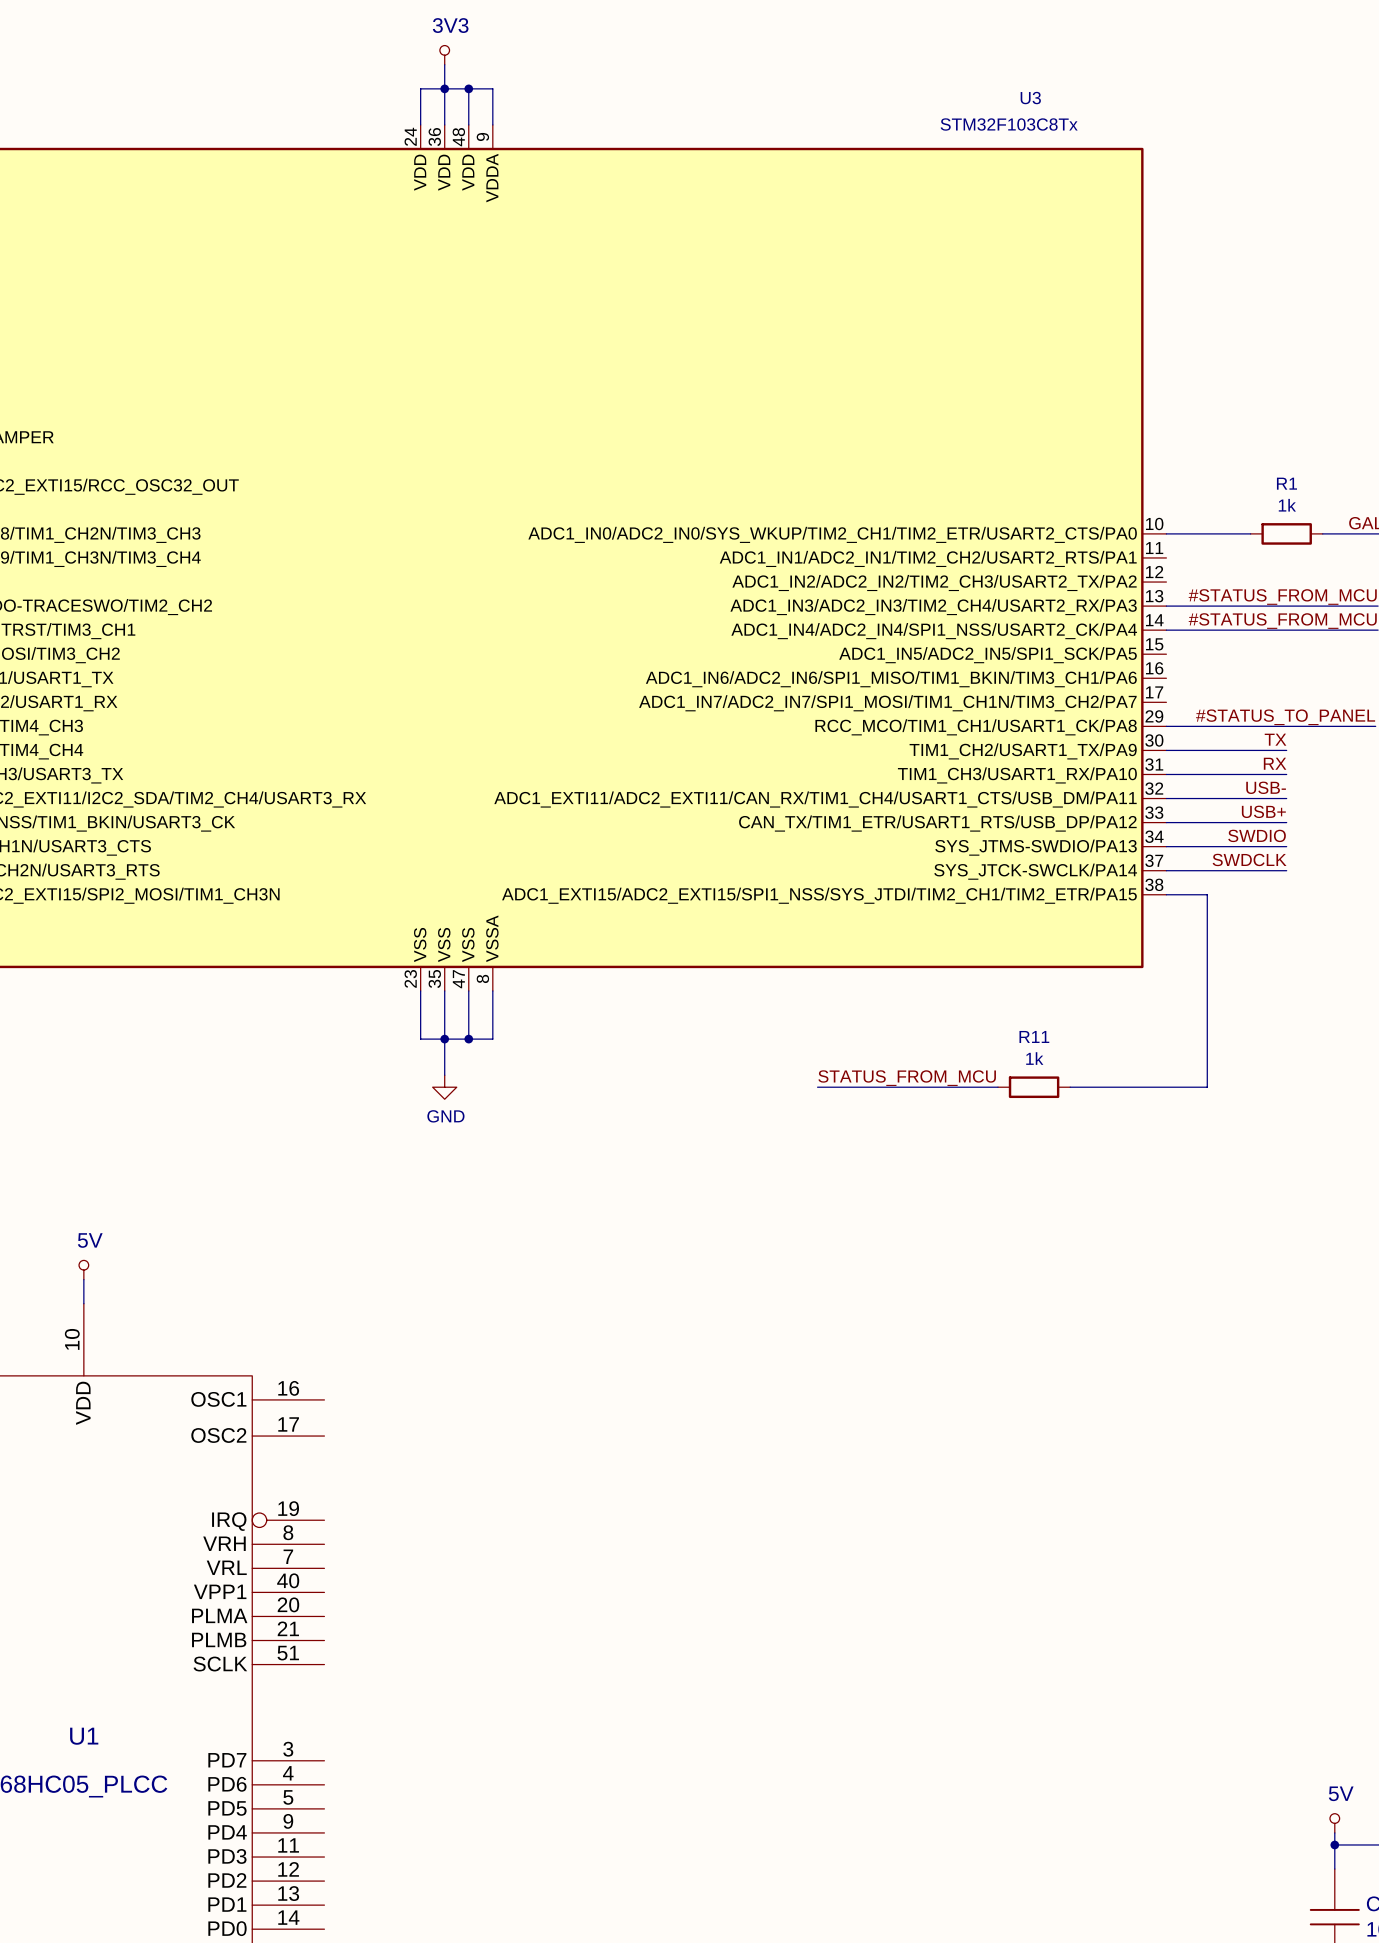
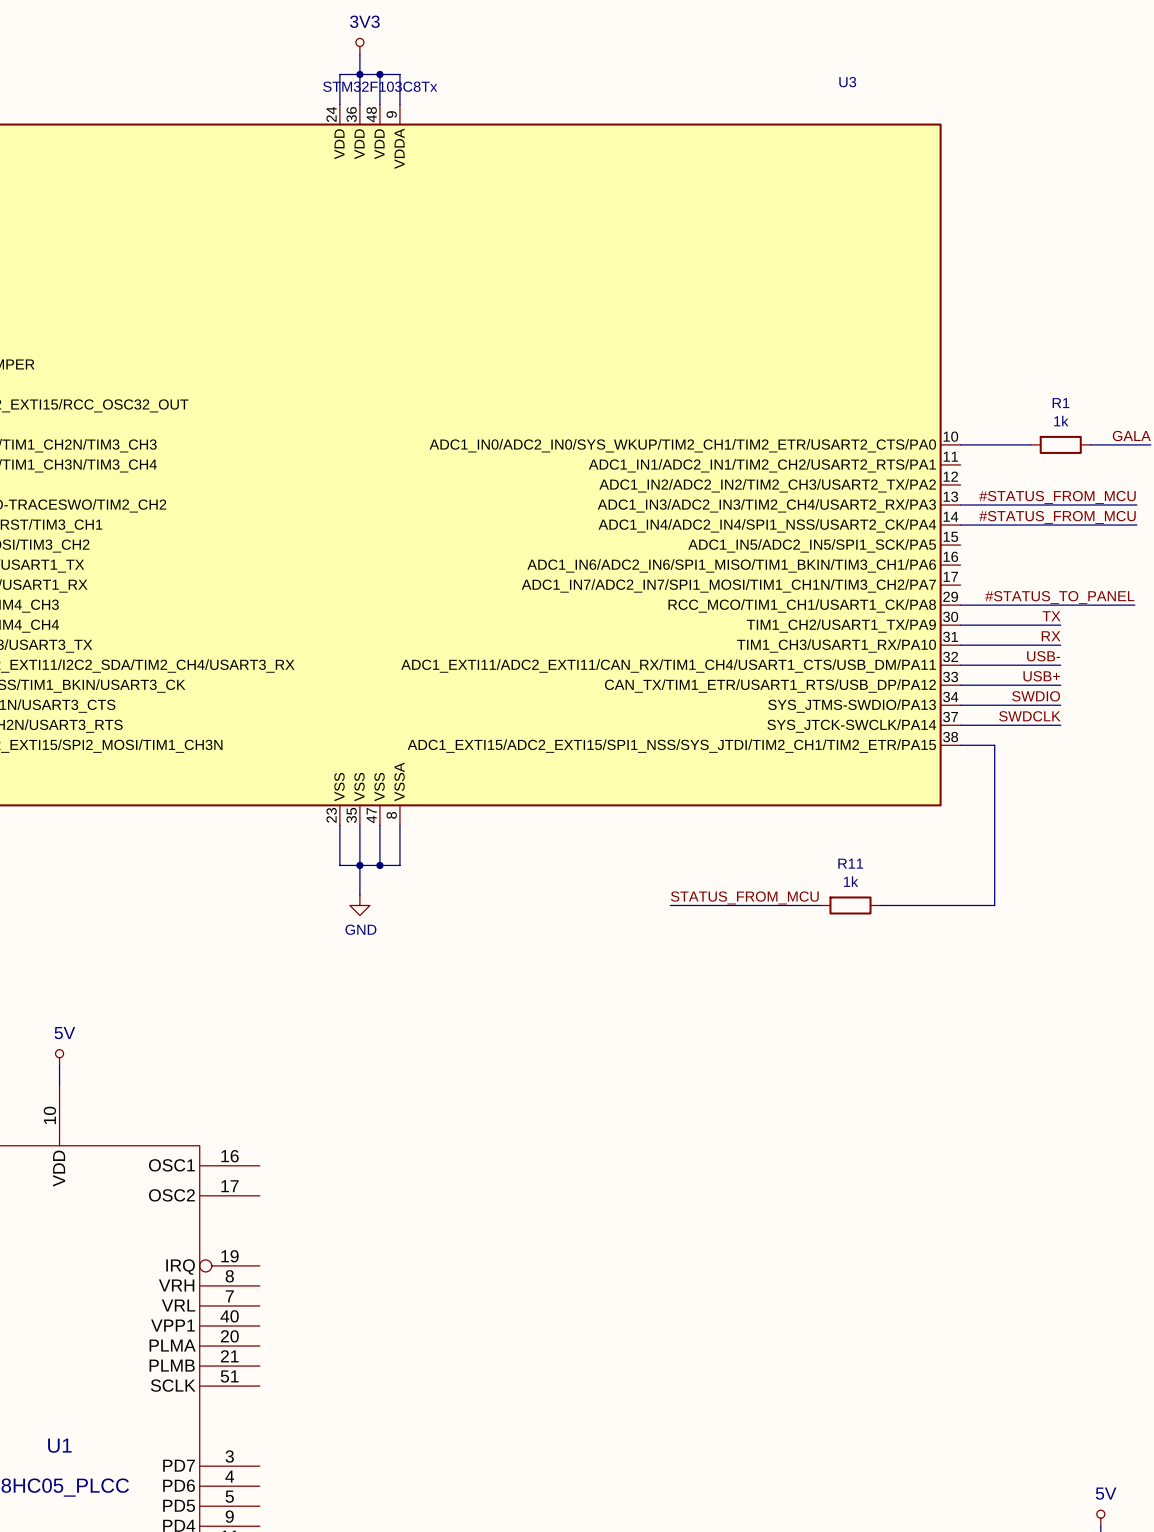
U3 value position: STM32F103C8Tx (1009, 124) -> STM32F103C8Tx (380, 86)

